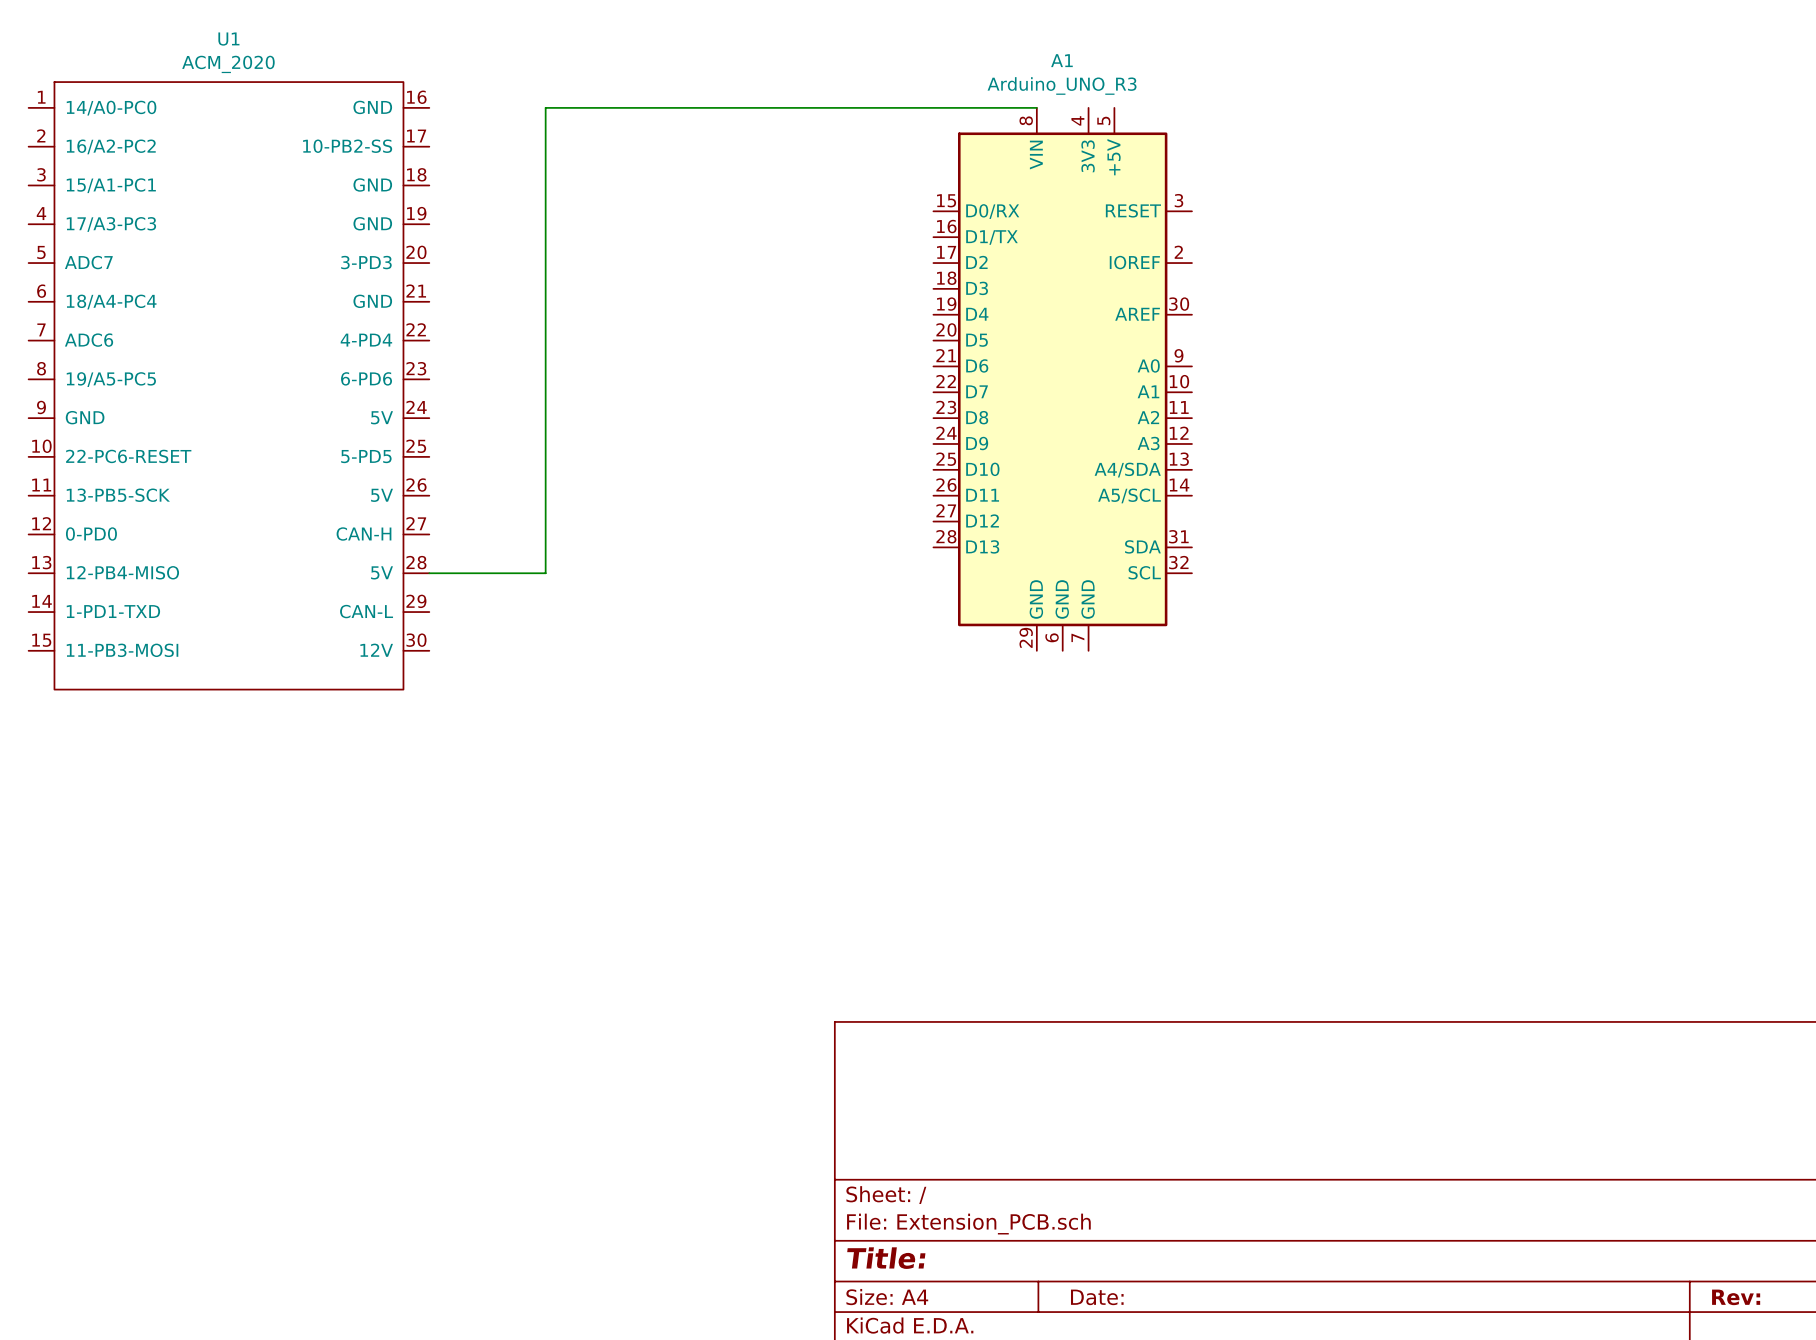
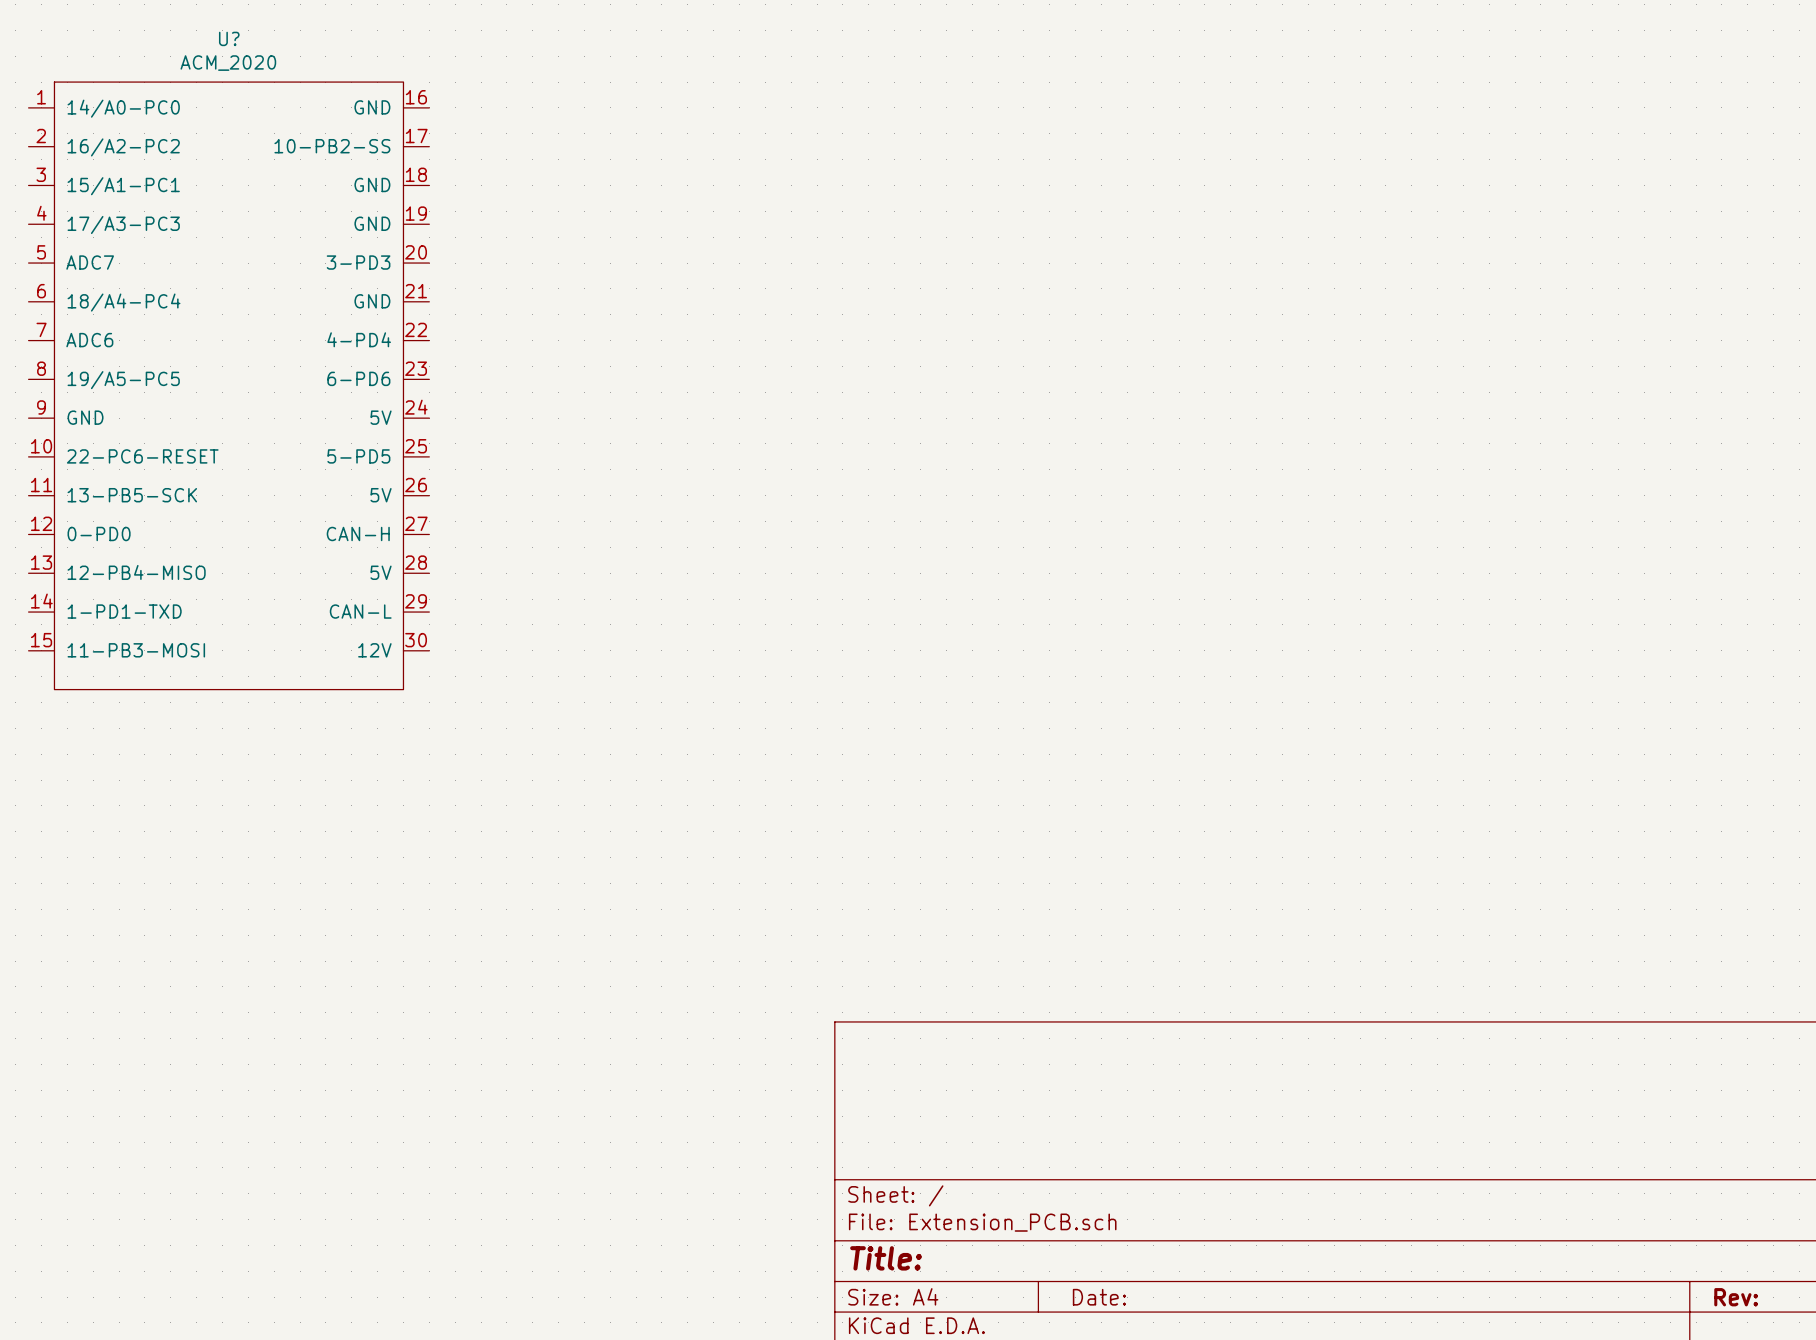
U1 name: U1 (228, 39) -> U? (229, 38)
wire: (1036, 107) (545, 107) (545, 573) (429, 573) -> none
A1: Arduino_UNO_R3 (1062, 379) -> none

